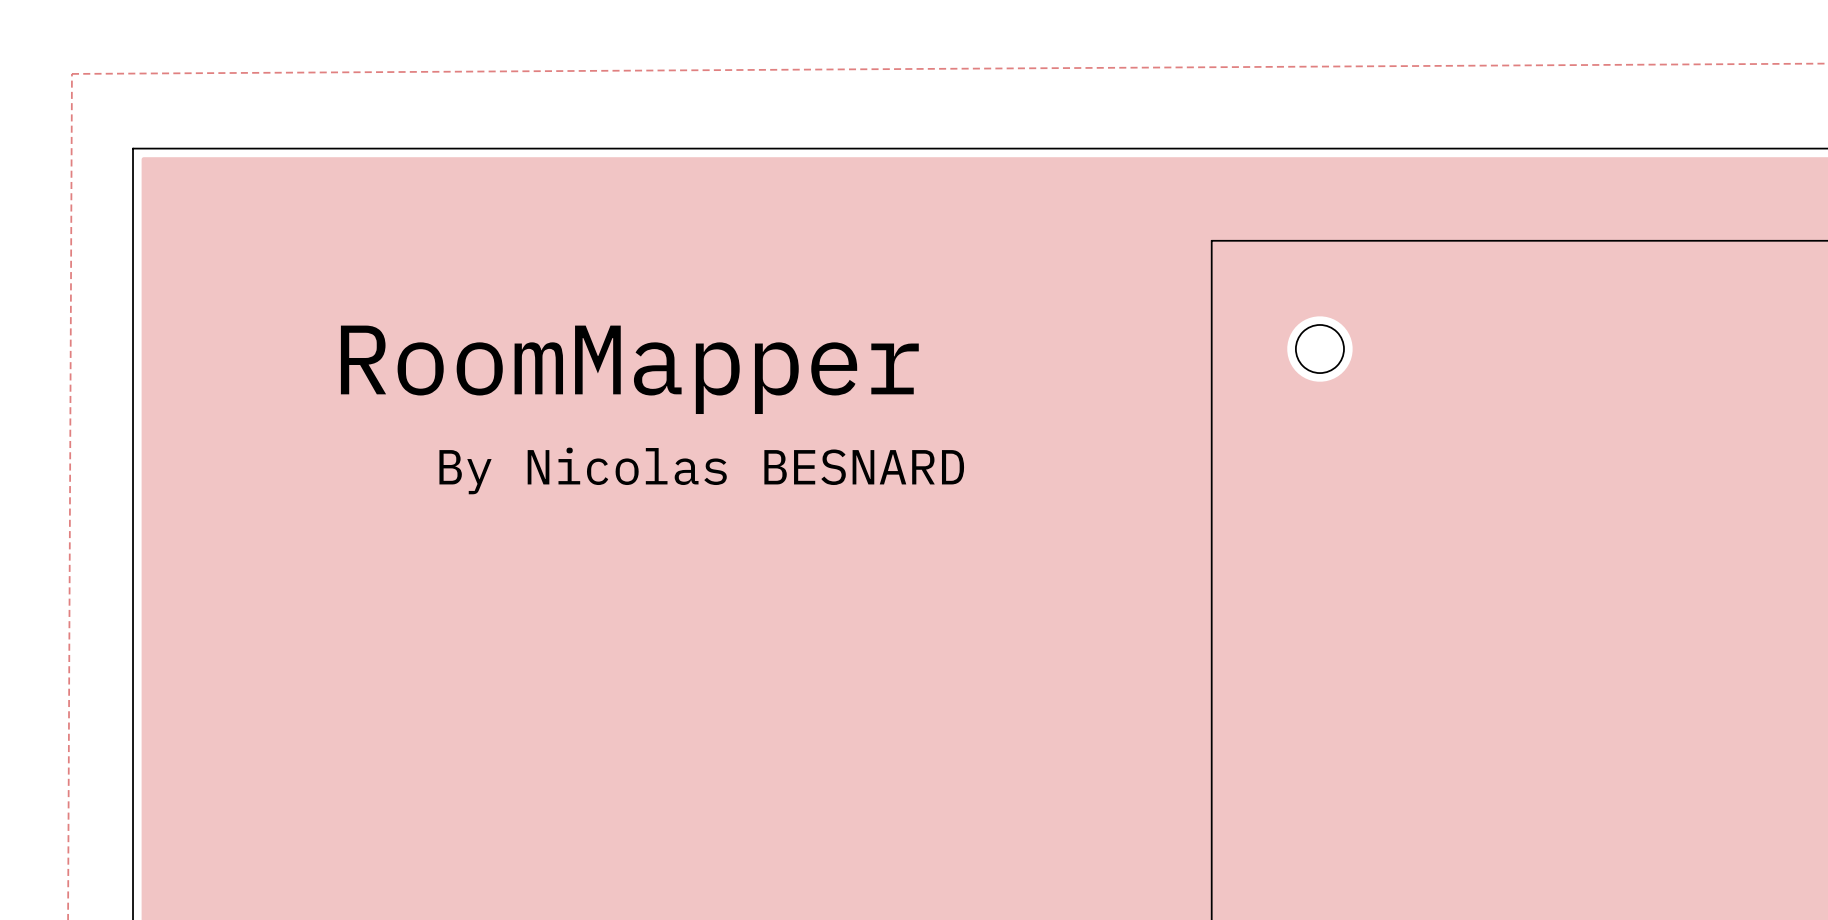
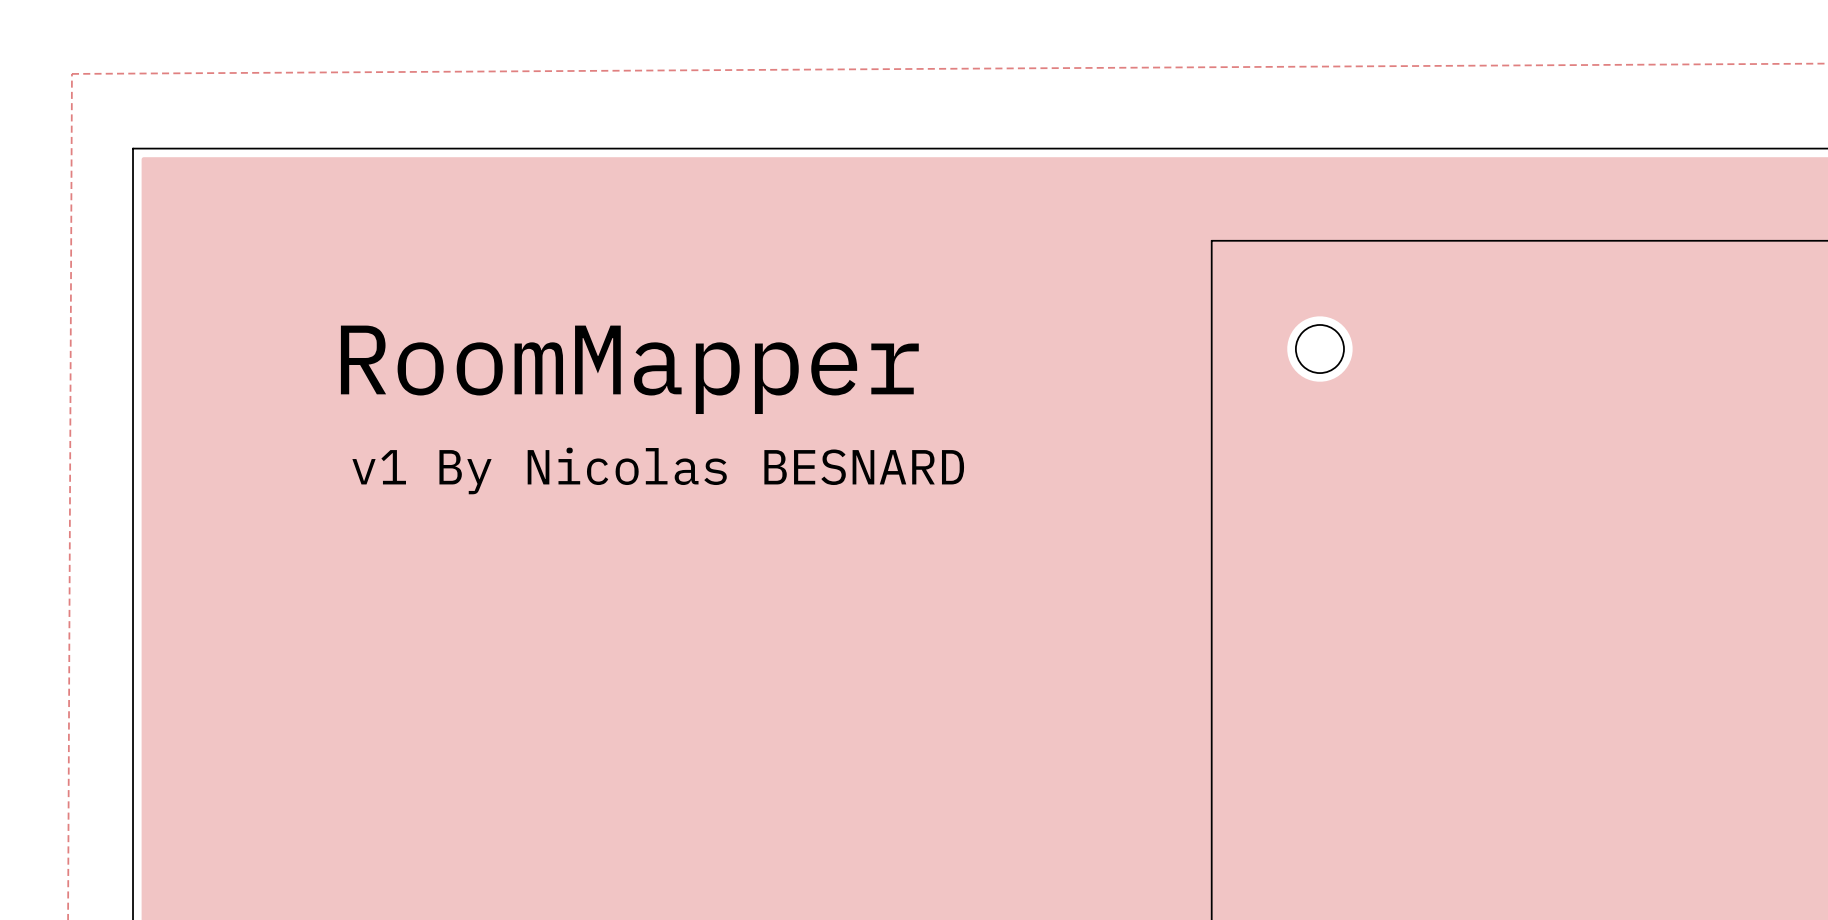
text: none -> v1 (379, 467)

